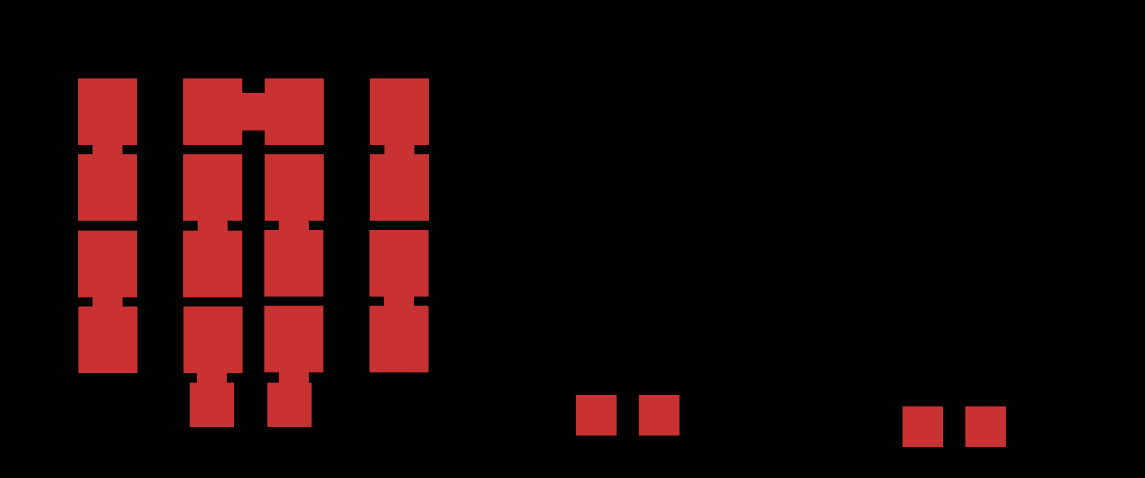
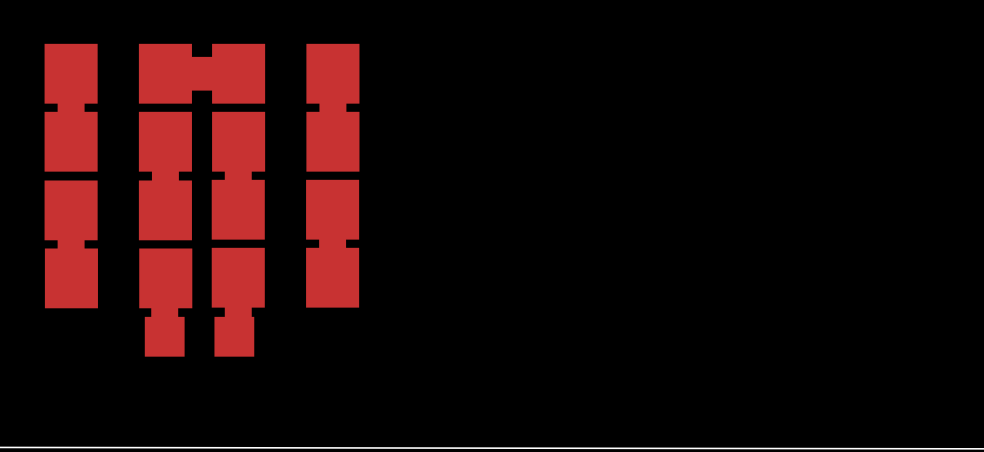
part: (627, 415) -> none
part: (954, 426) -> none

